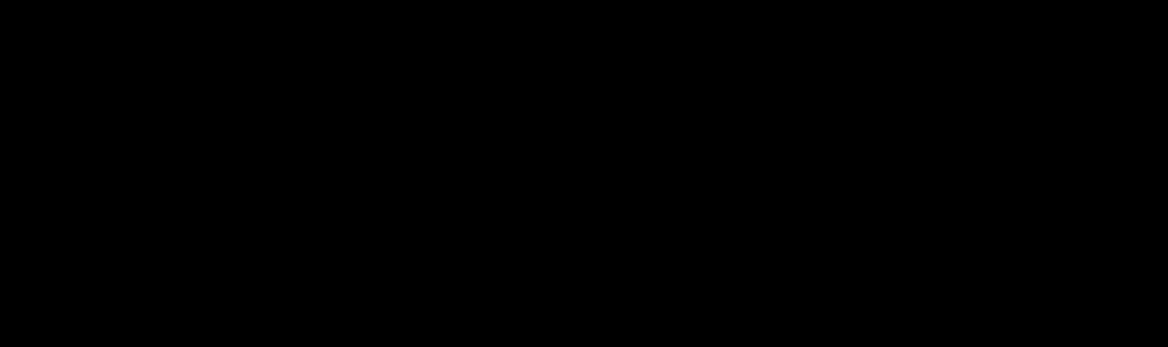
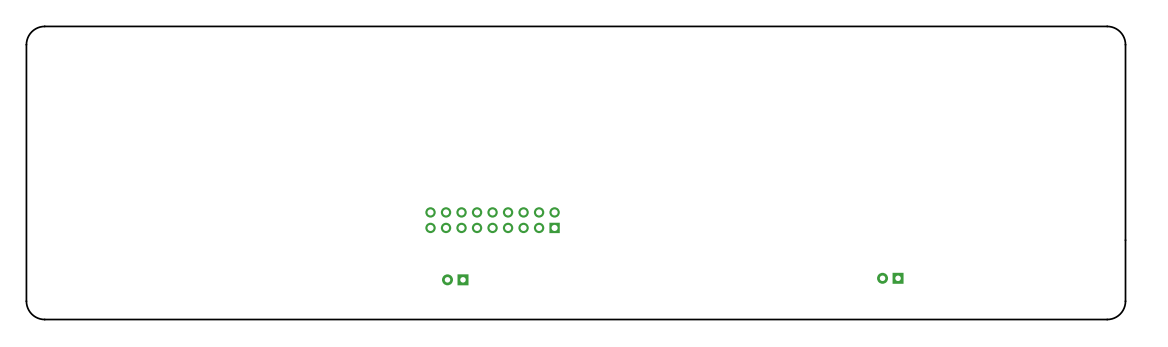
board edge: none -> (1107, 26) (40, 27) (30, 33) (26, 44) (27, 305) (33, 315) (44, 319) (1111, 318) (1121, 312) (1125, 301) (1125, 44) (1120, 31) (1107, 26)
part: none -> (492, 220)
part: none -> (890, 278)
part: none -> (455, 279)

